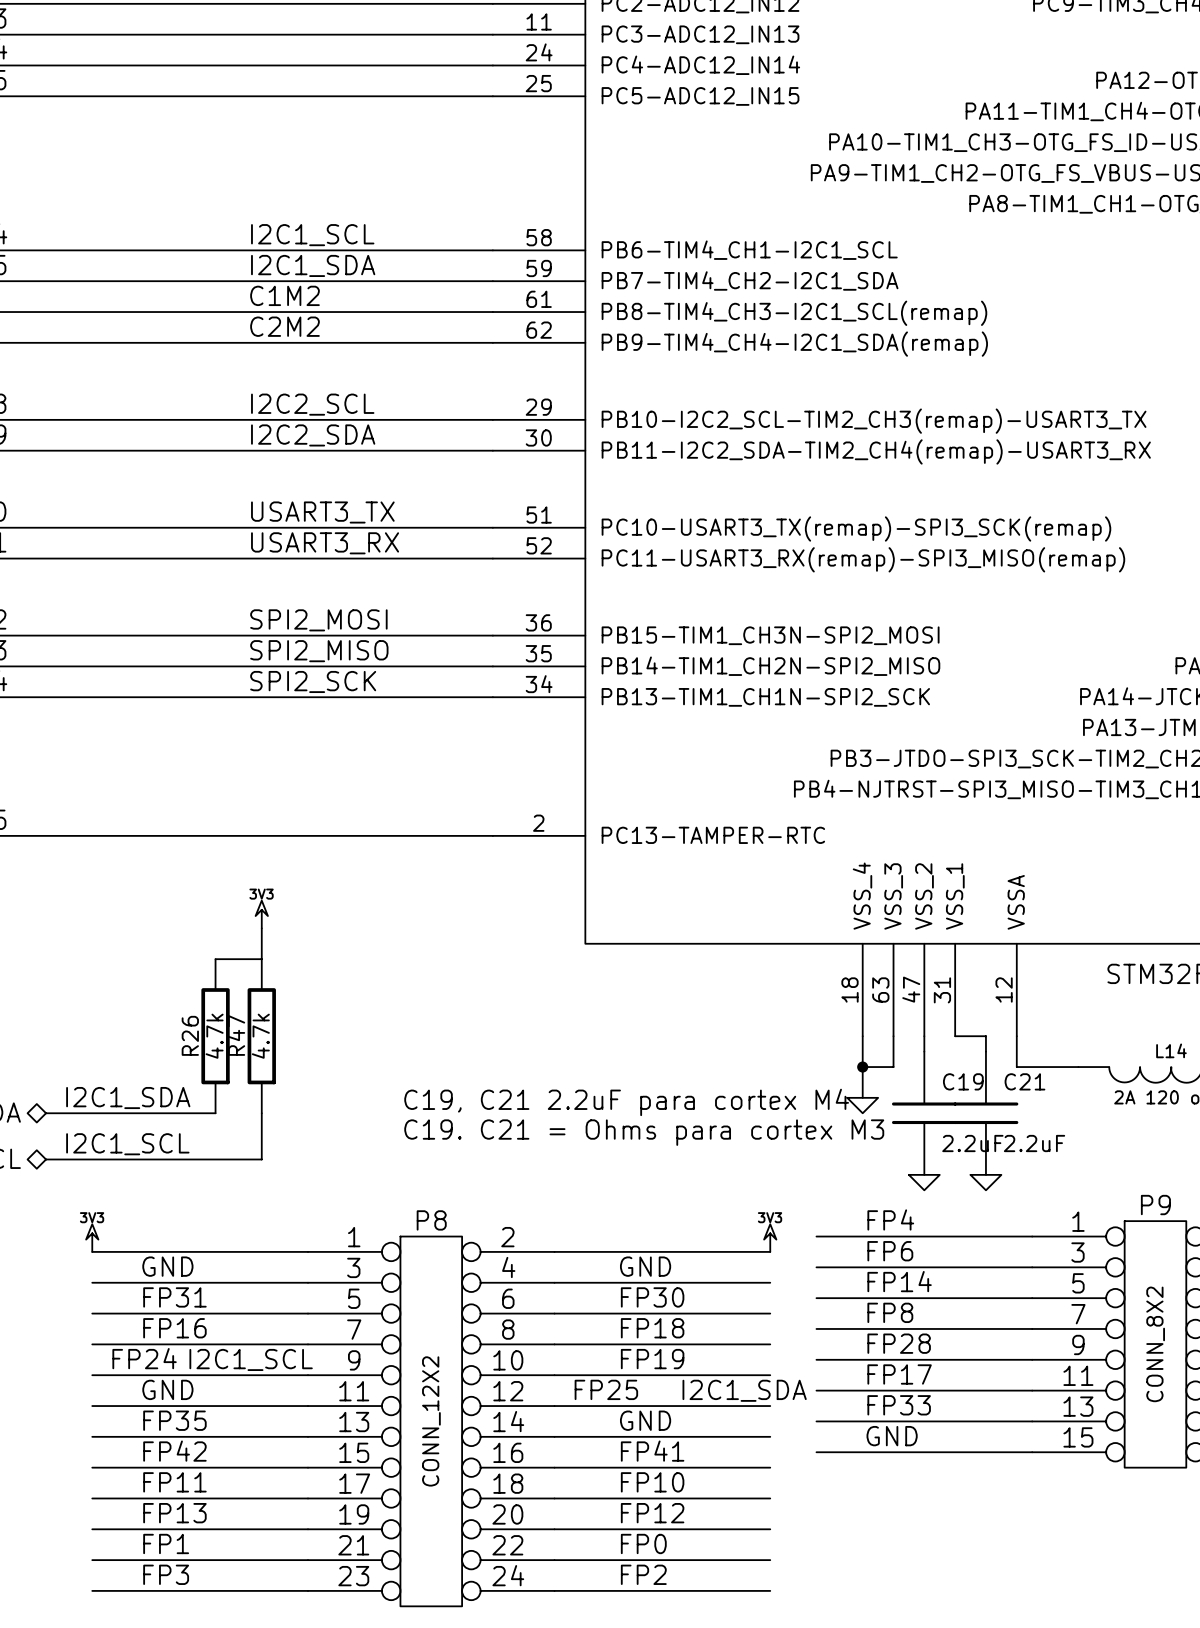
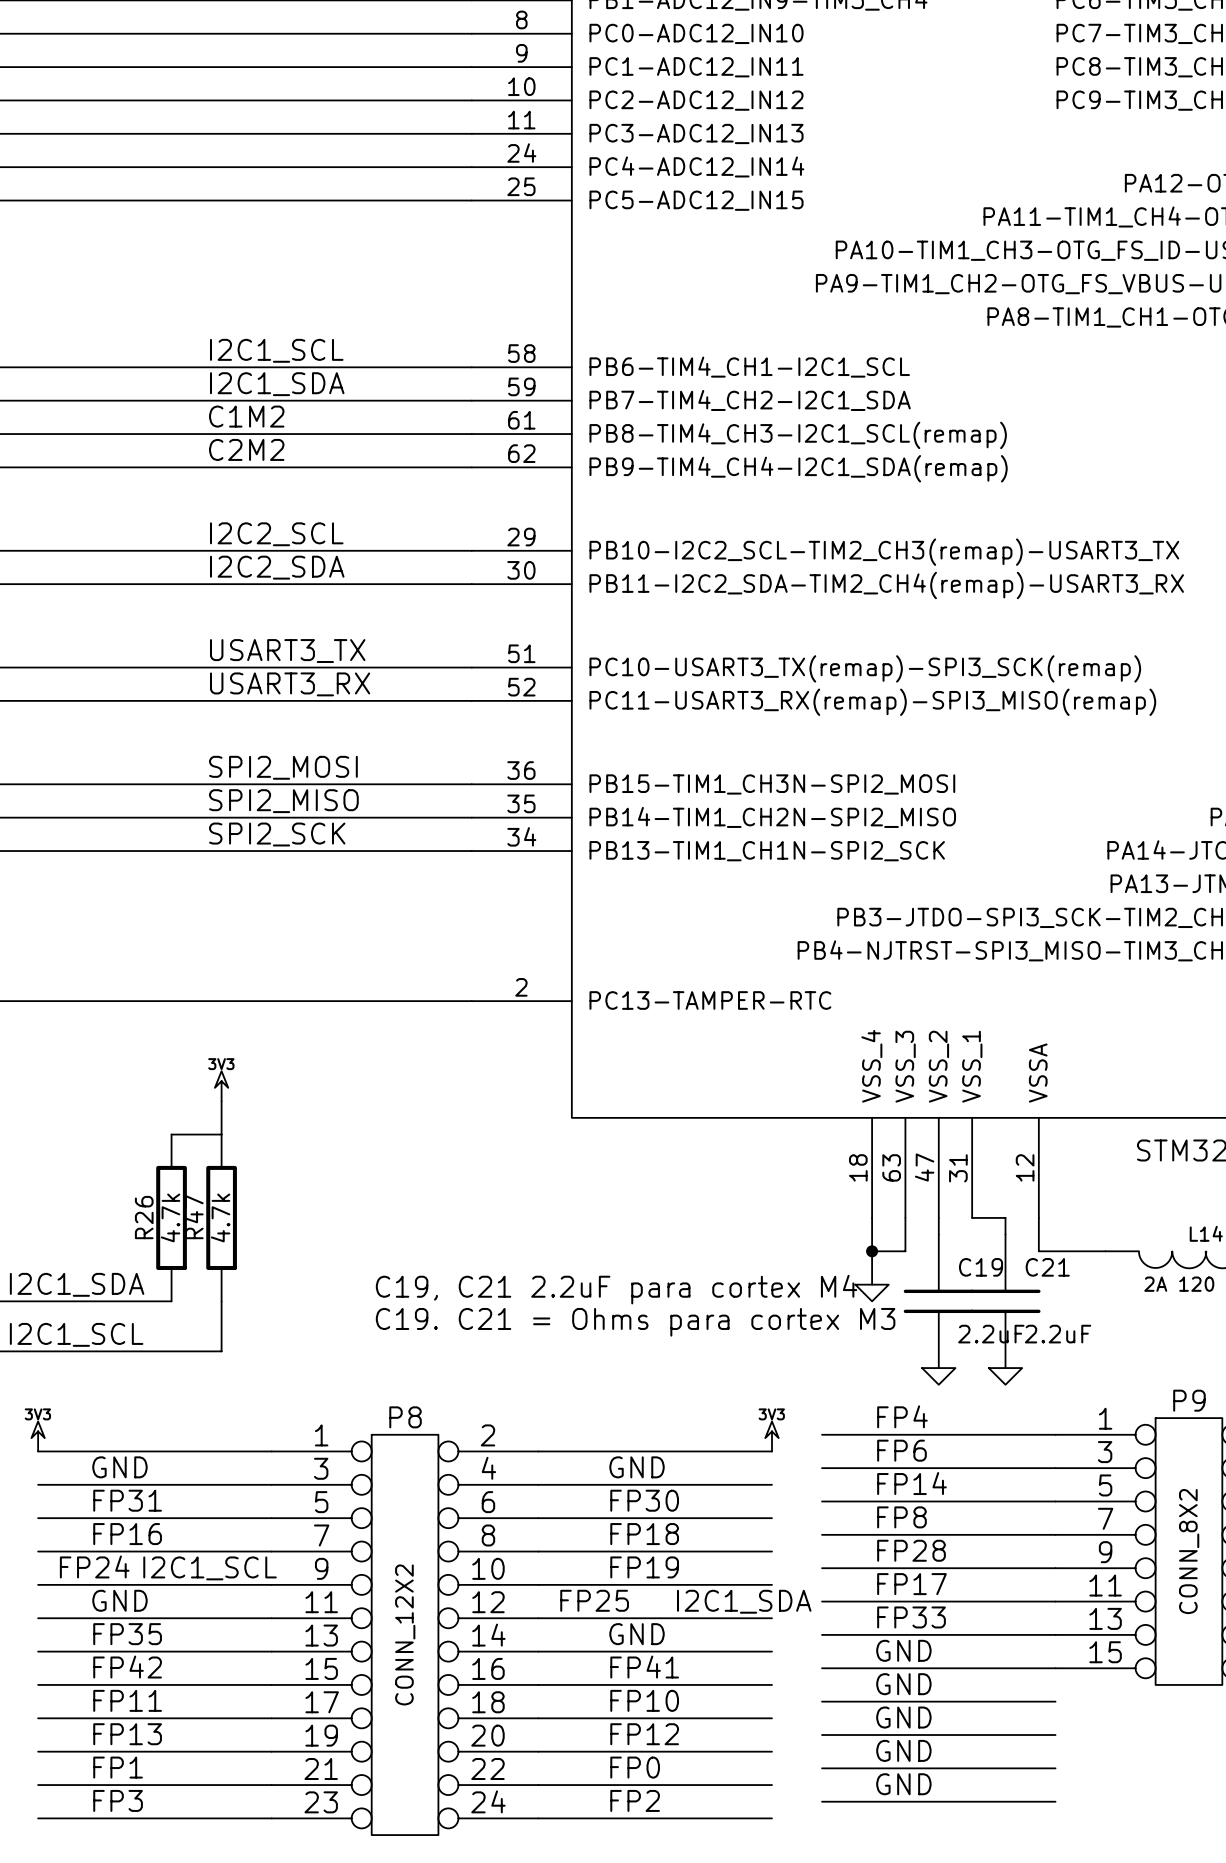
label: none -> GND (903, 1684)
wire: none -> (822, 1701) (1055, 1701)
label: none -> GND (903, 1717)
wire: none -> (822, 1735) (1055, 1735)
label: none -> GND (903, 1750)
wire: none -> (822, 1768) (1055, 1768)
label: none -> GND (903, 1784)
wire: none -> (822, 1801) (1055, 1801)

